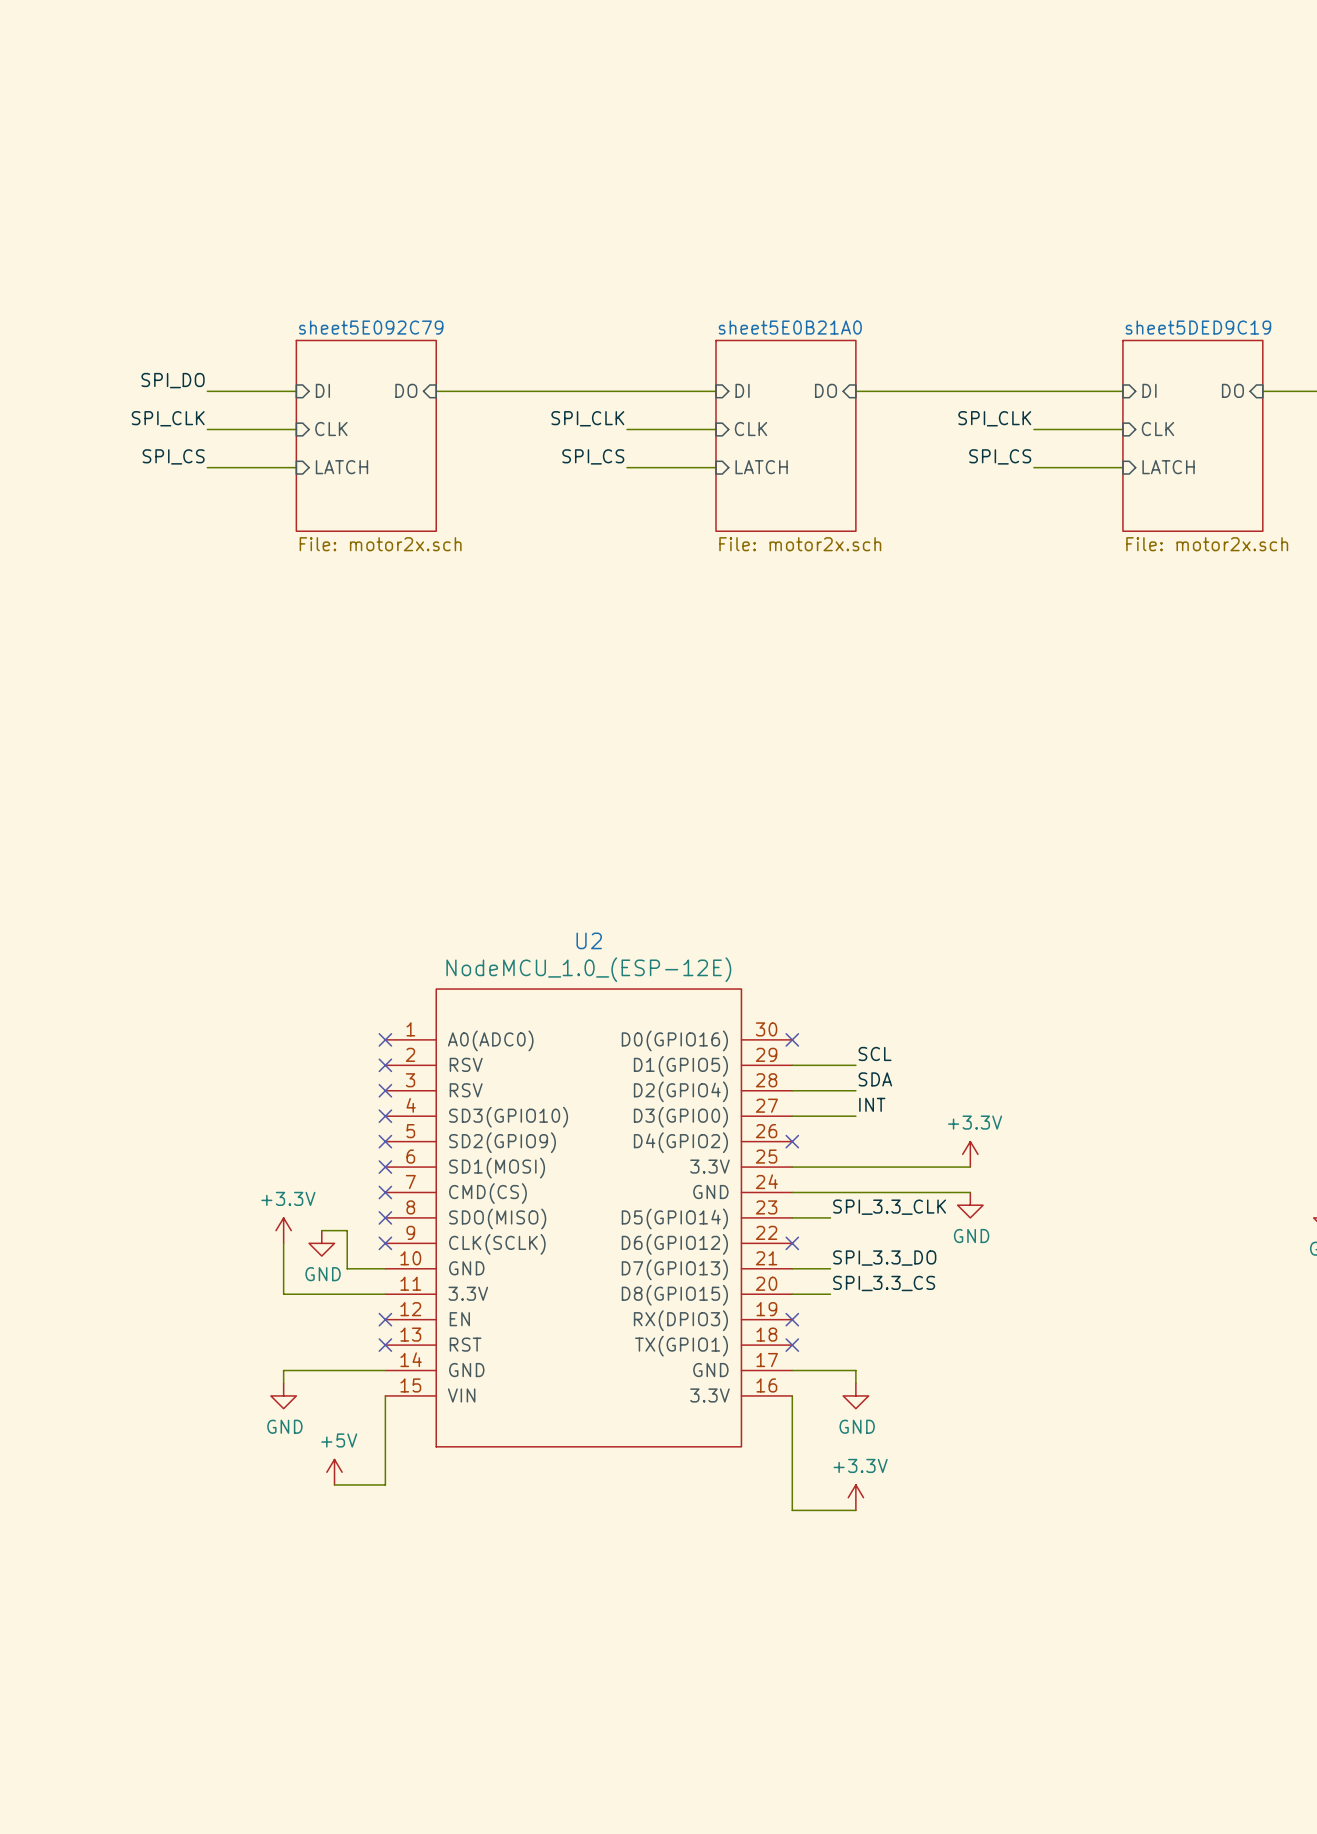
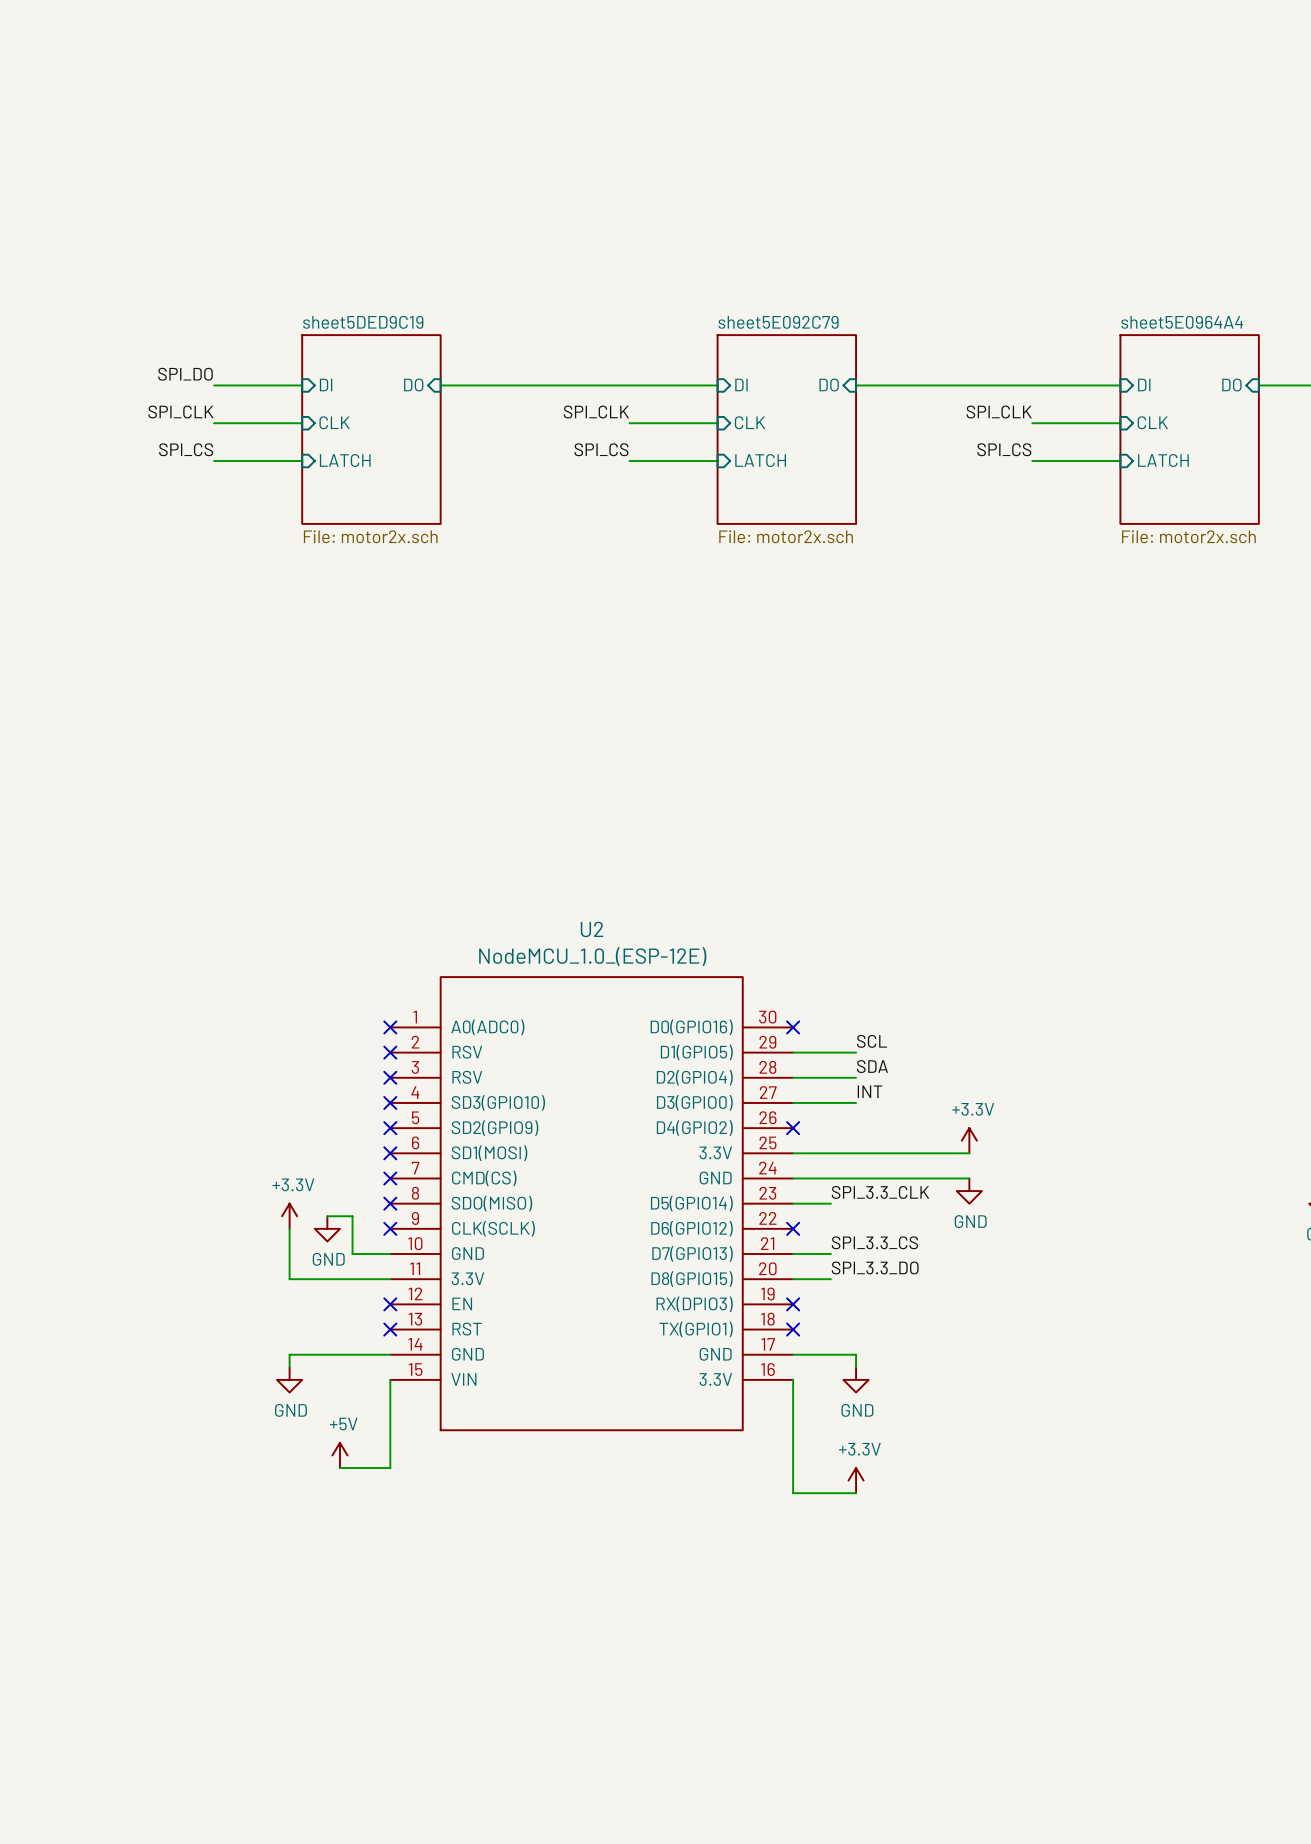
sheet sheet5E092C79 name: sheet5E092C79 (371, 327) -> sheet5DED9C19 (363, 322)
sheet sheet5E0B21A0 name: sheet5E0B21A0 (790, 327) -> sheet5E092C79 (778, 322)
sheet sheet5DED9C19 name: sheet5DED9C19 (1198, 327) -> sheet5E0964A4 (1182, 322)
label: SPI_3.3_DO (884, 1258) -> SPI_3.3_CS (874, 1242)
label: SPI_3.3_CS (884, 1283) -> SPI_3.3_DO (875, 1267)

